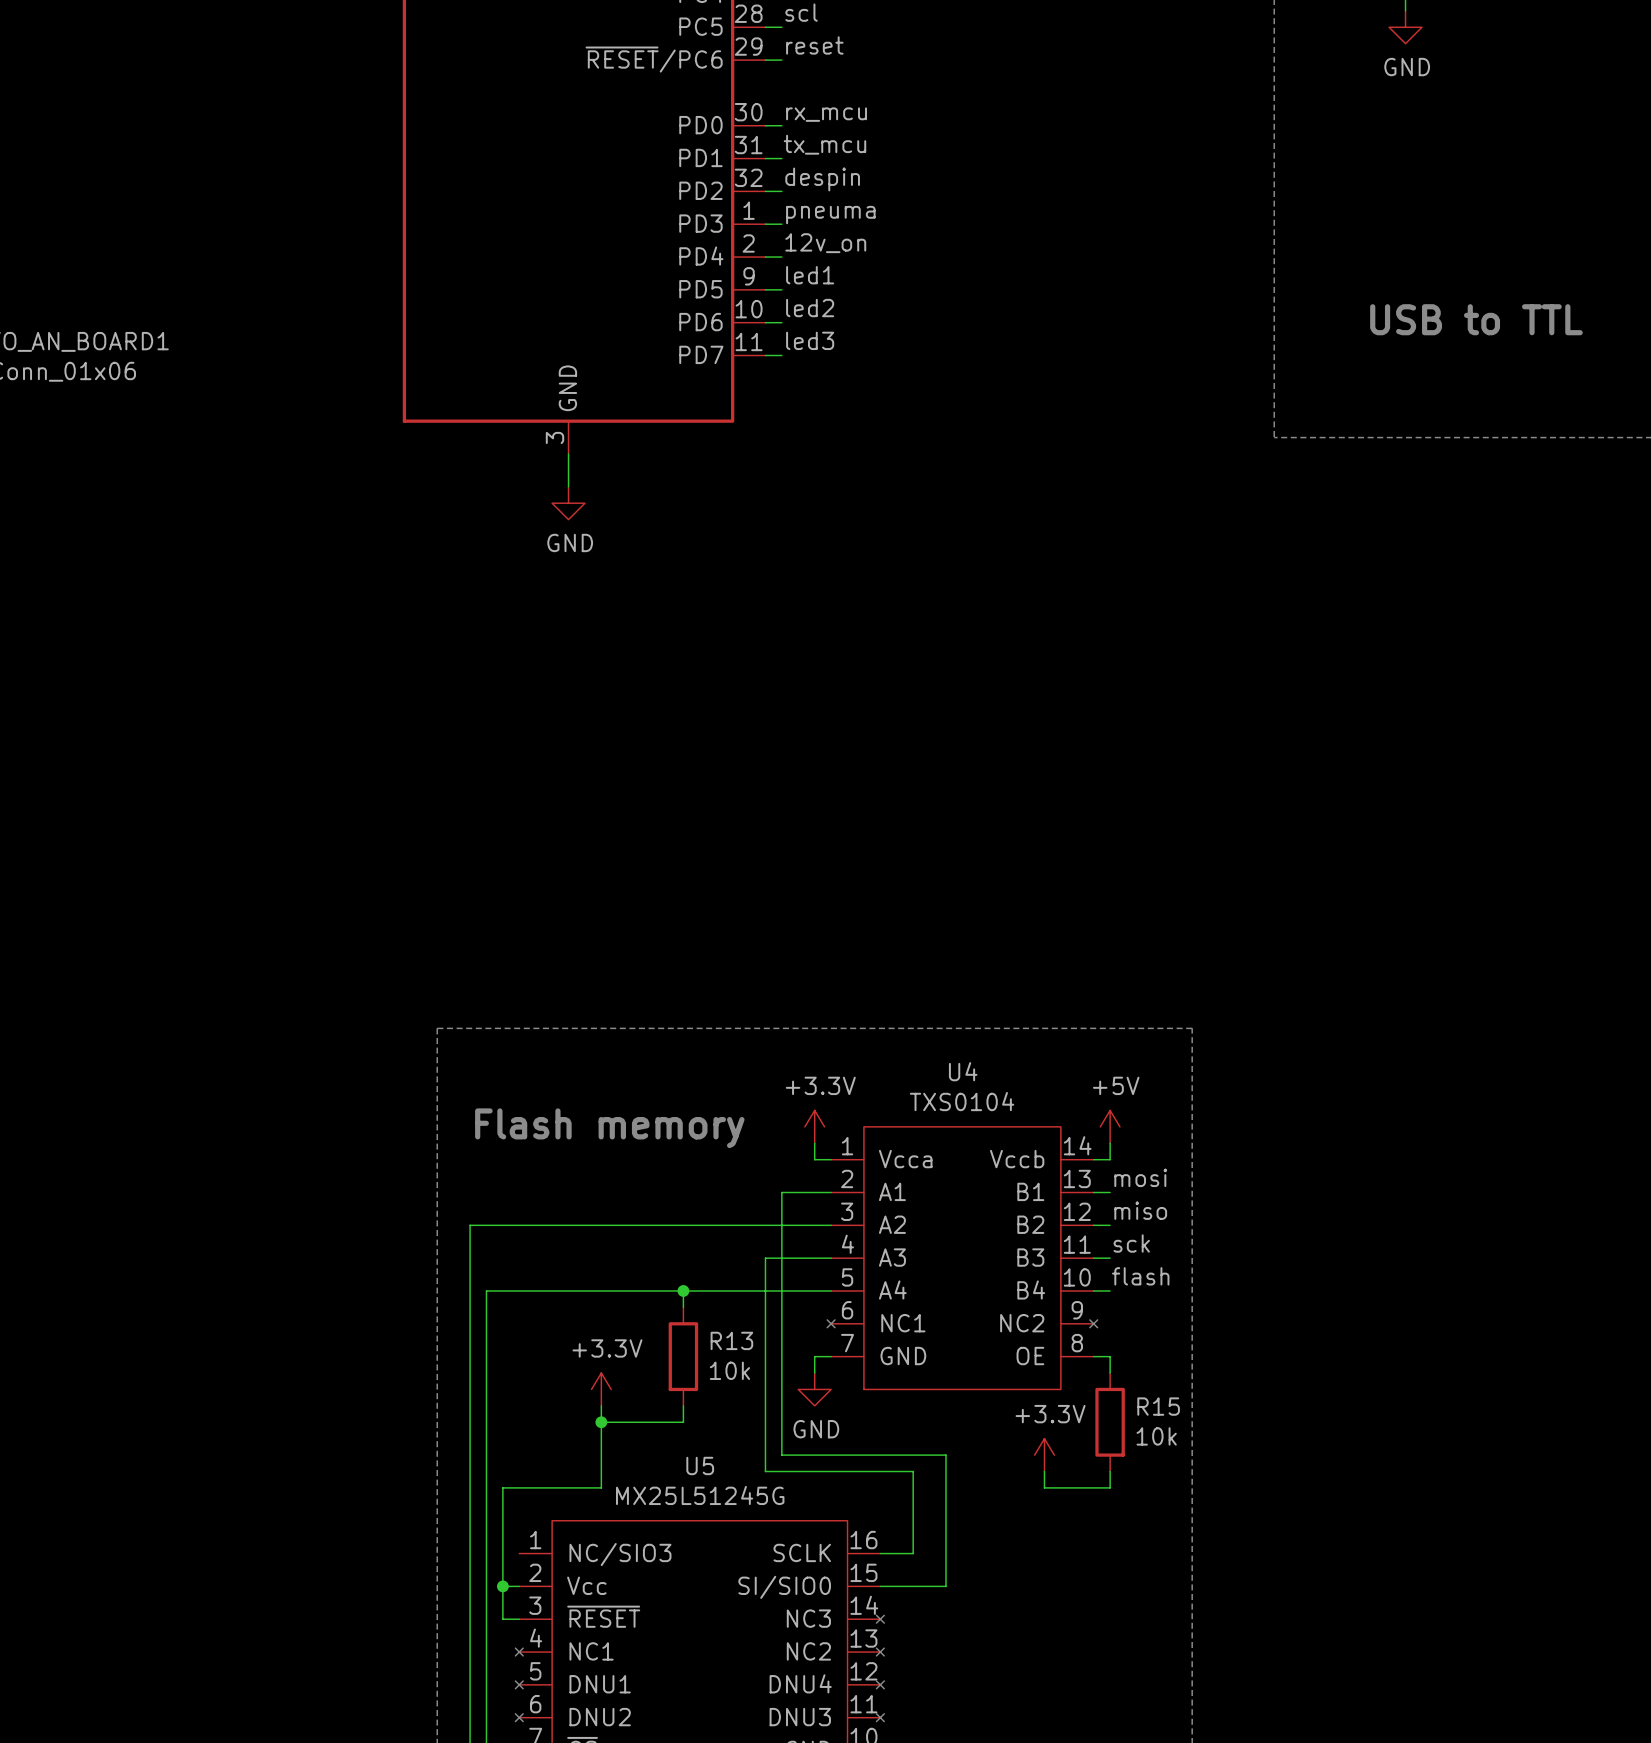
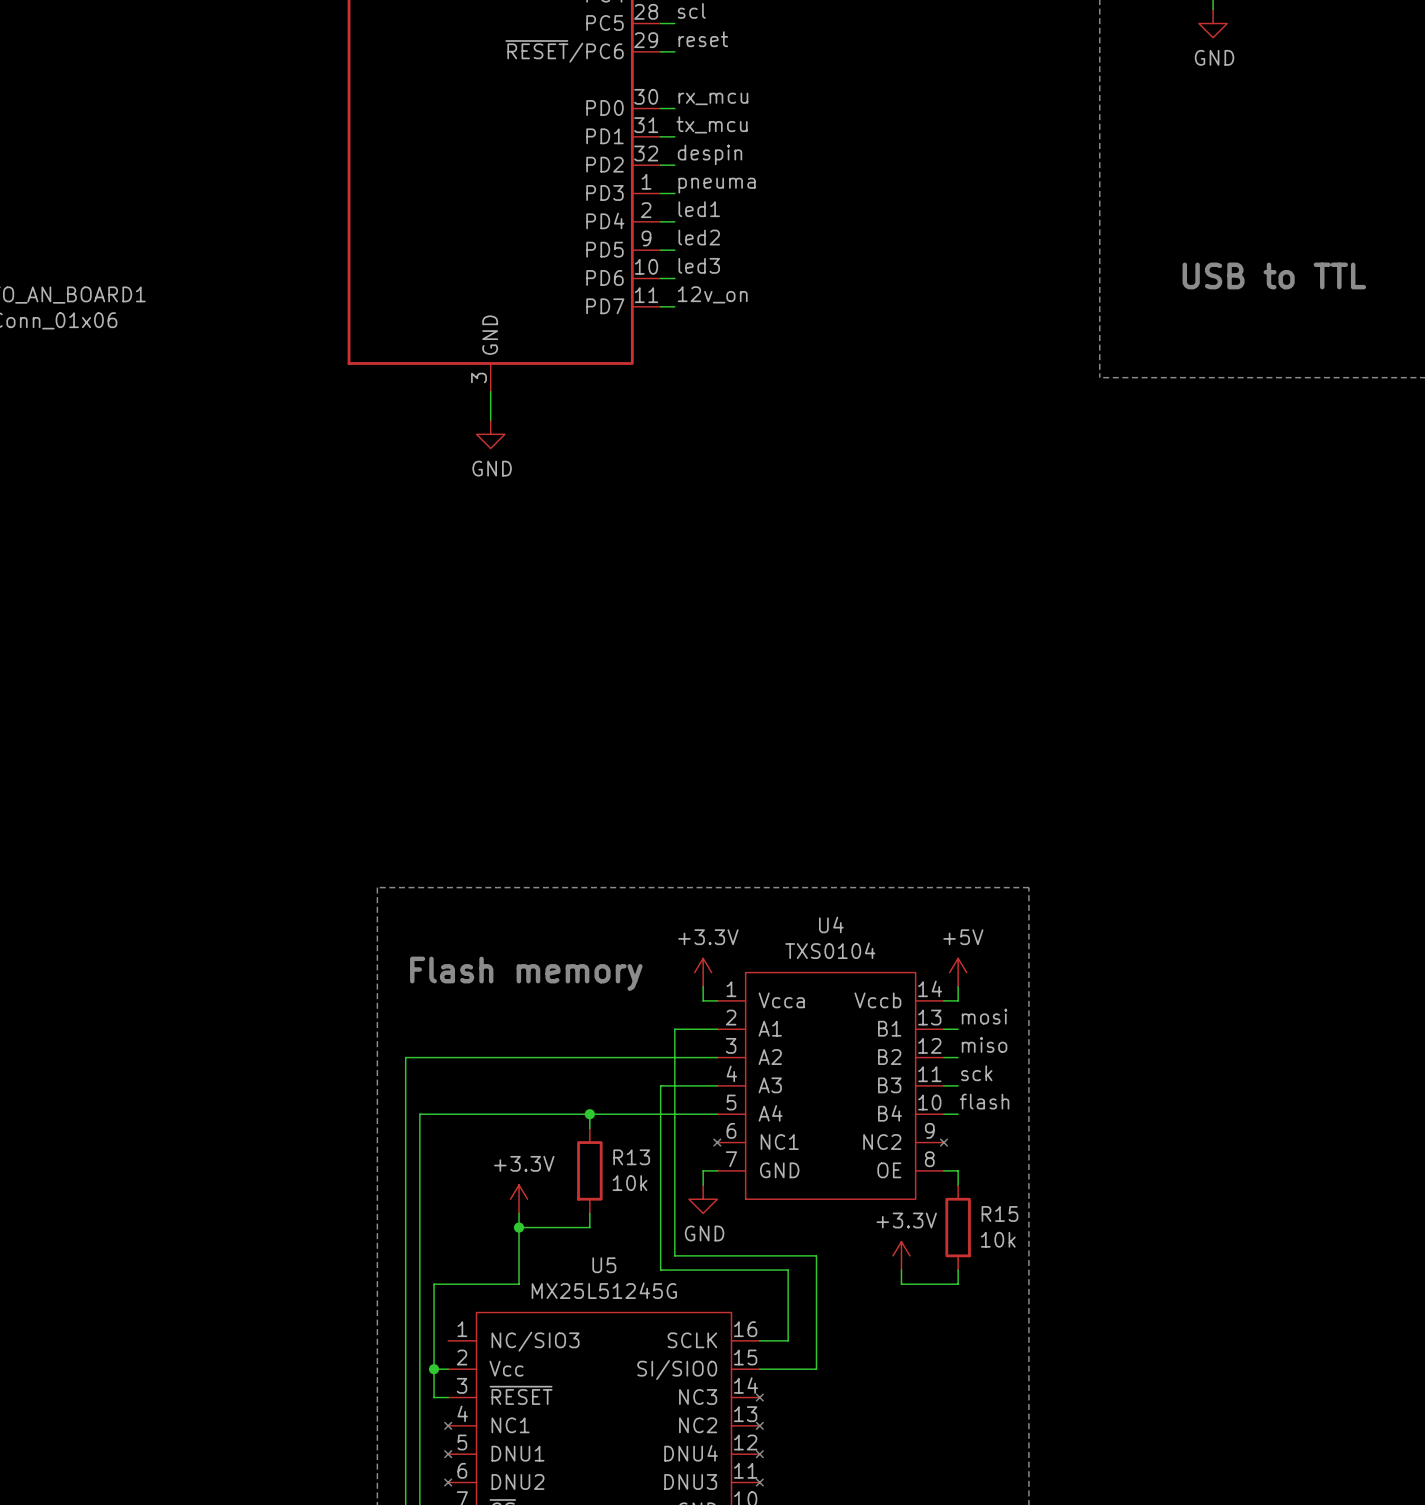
label: 12v_on (825, 243) -> led1 (699, 209)
label: led1 (810, 275) -> led2 (699, 237)
label: led2 (810, 308) -> led3 (699, 265)
label: led3 (810, 340) -> 12v_on (712, 294)

